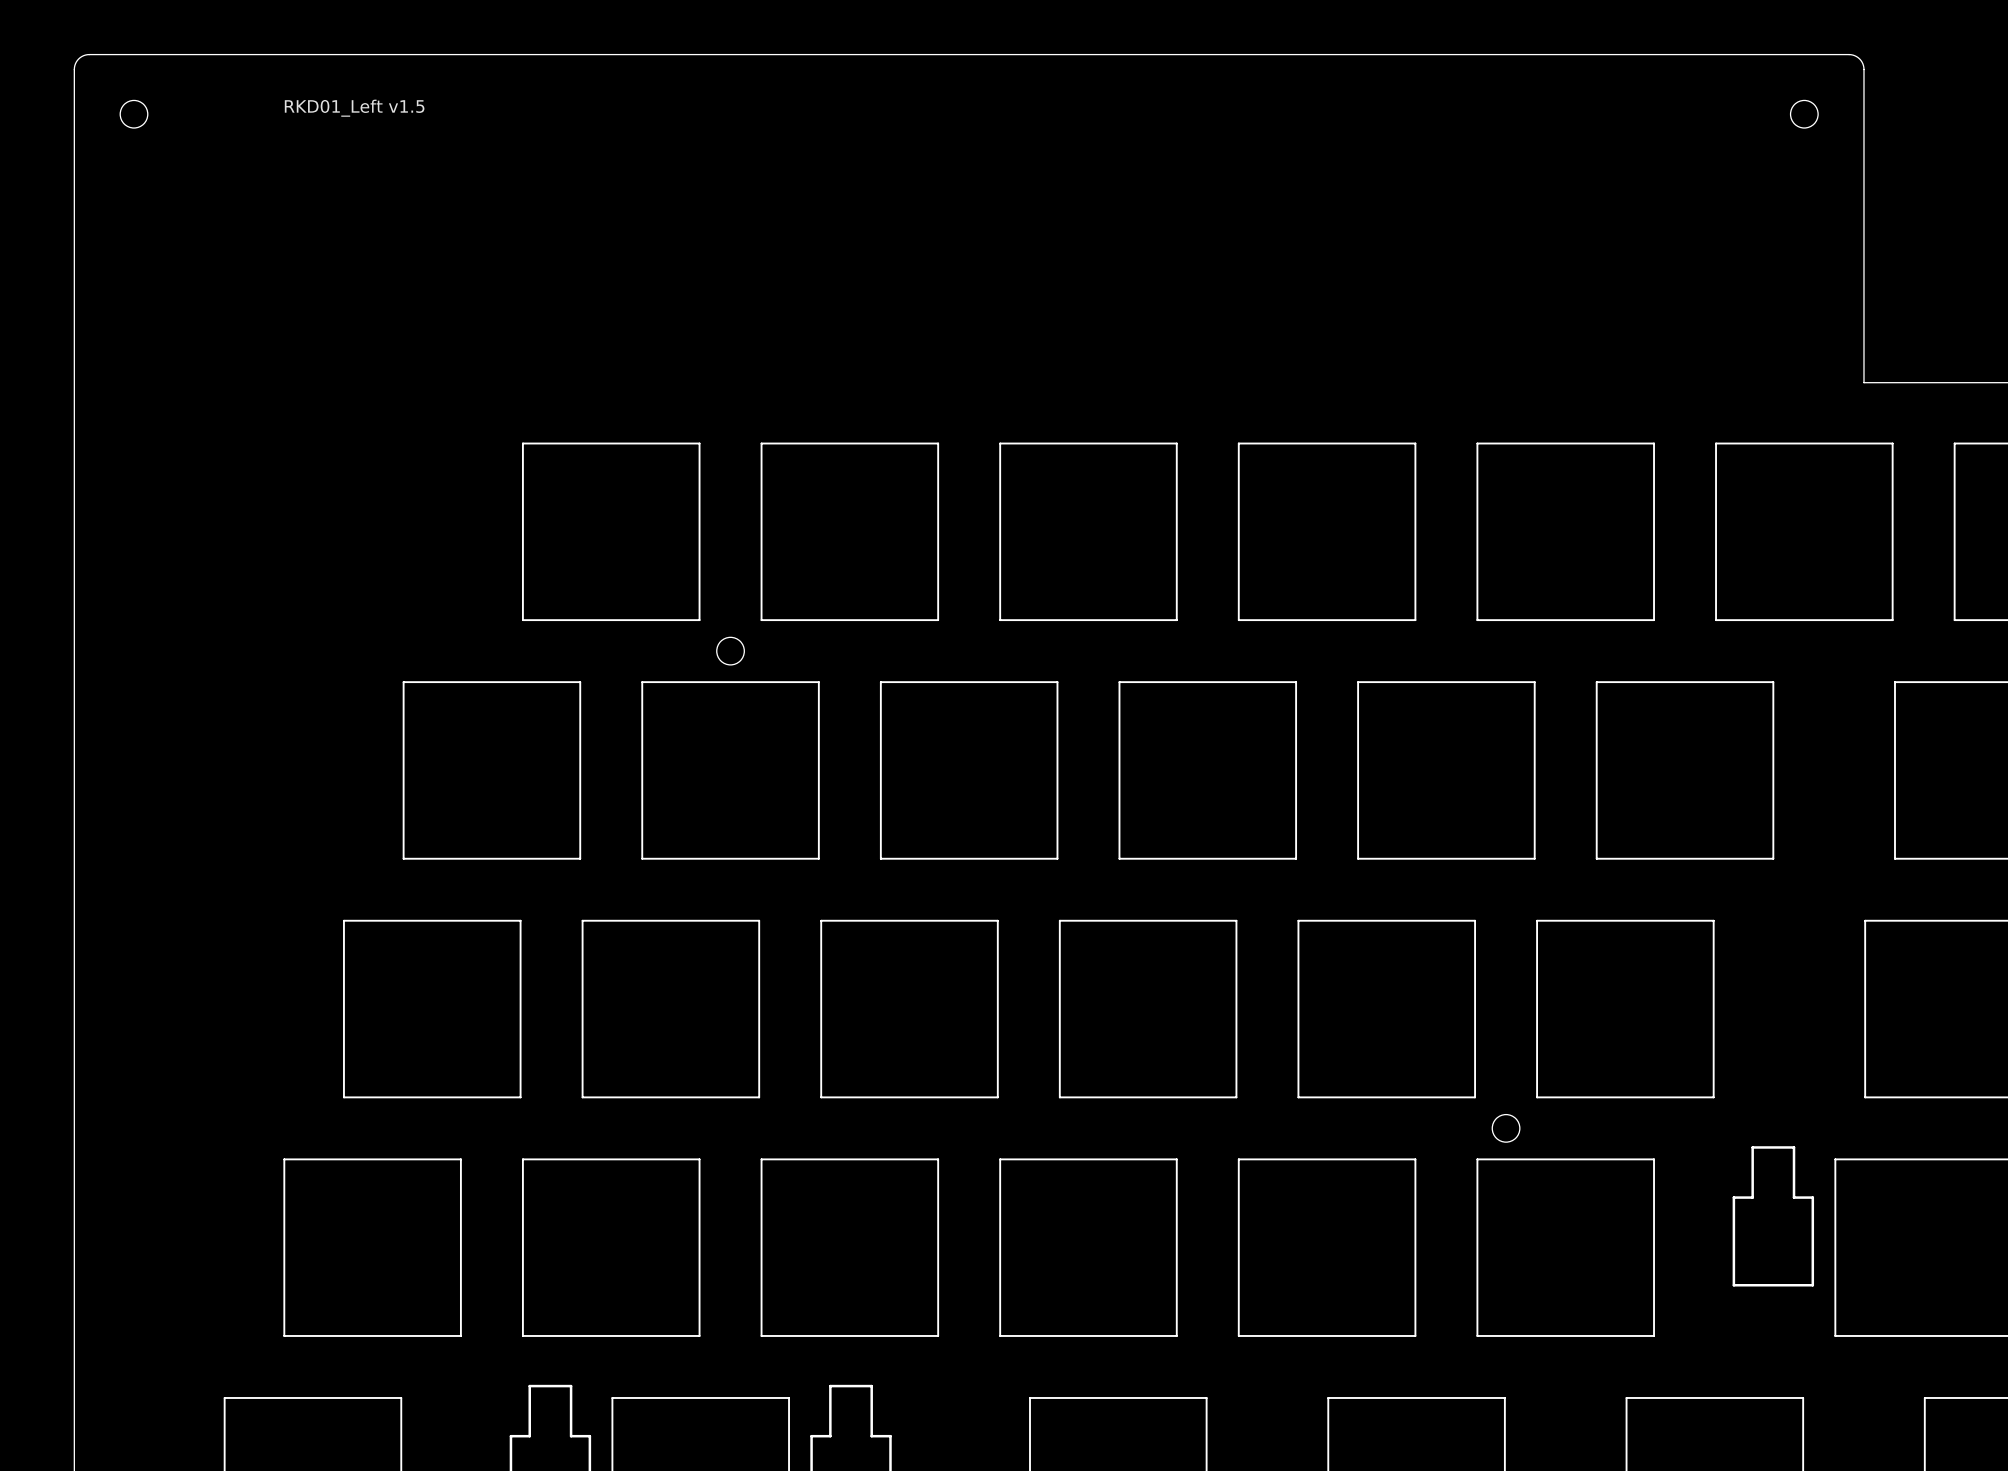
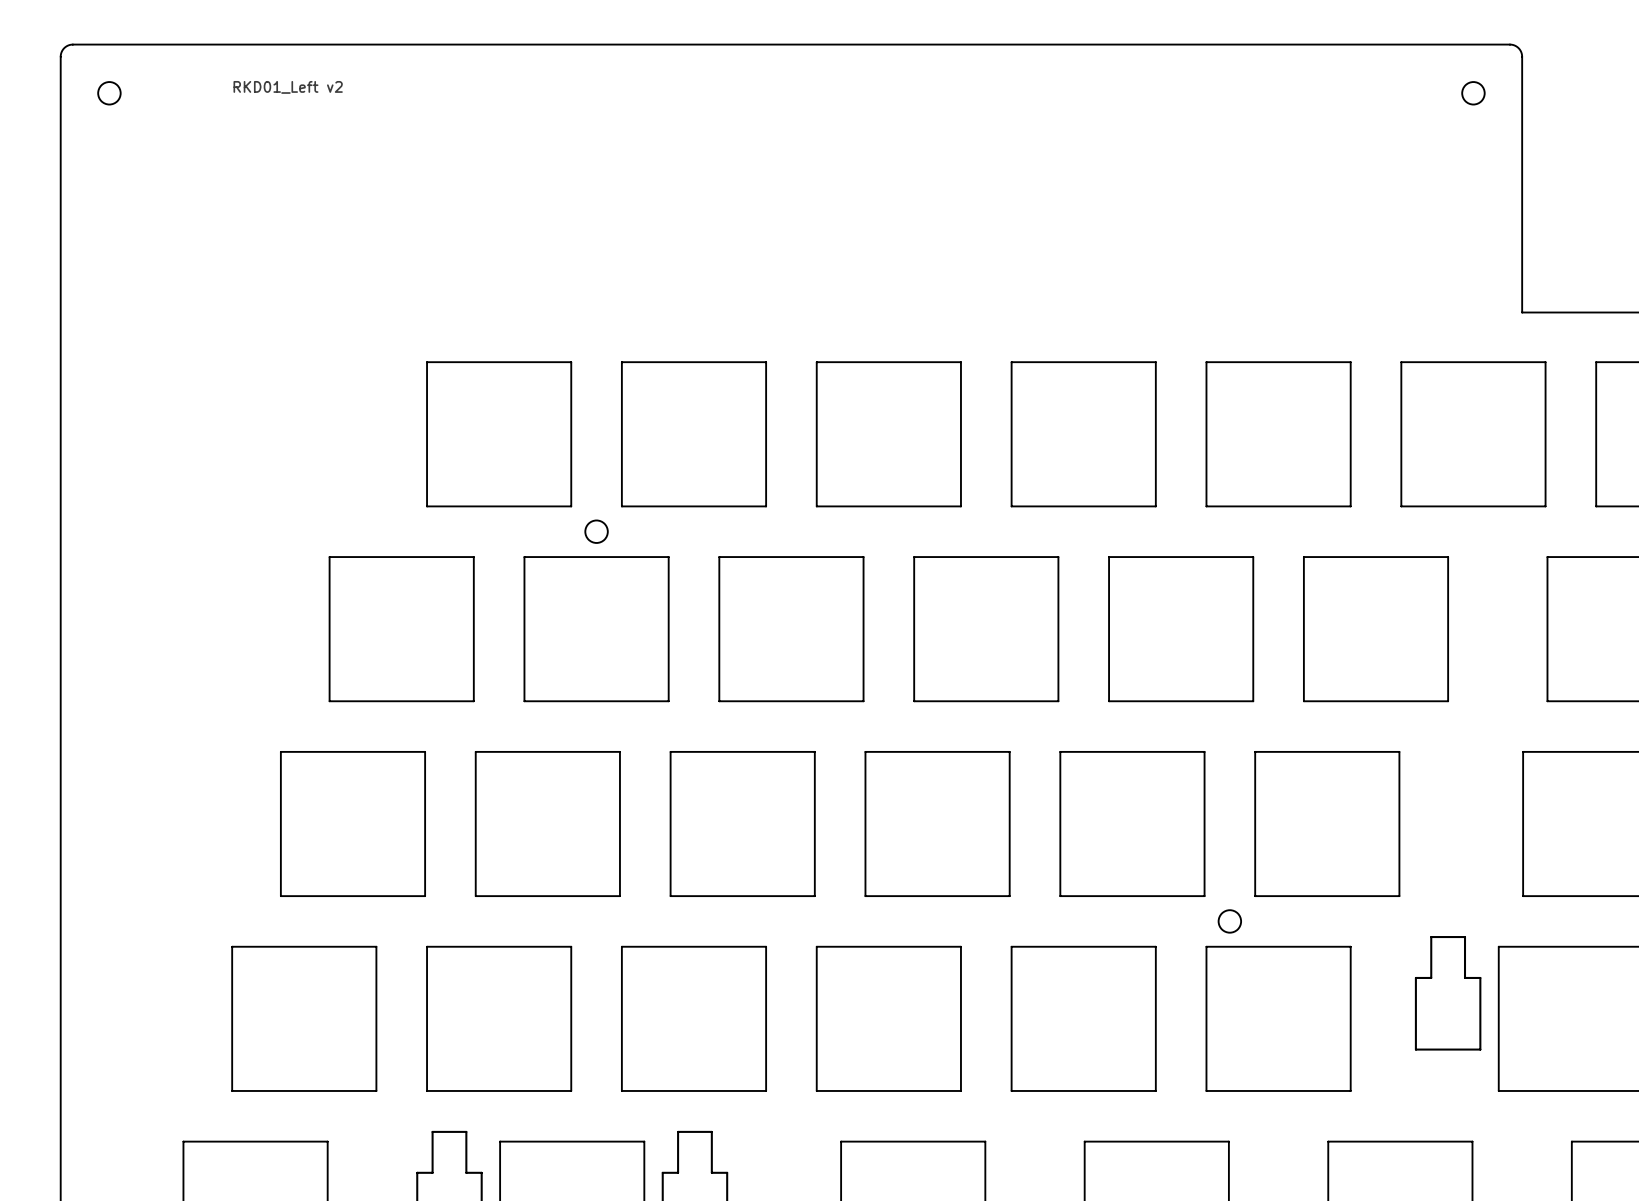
text: RKD01_Left v1.5 (354, 108) -> RKD01_Left v2 (288, 87)

